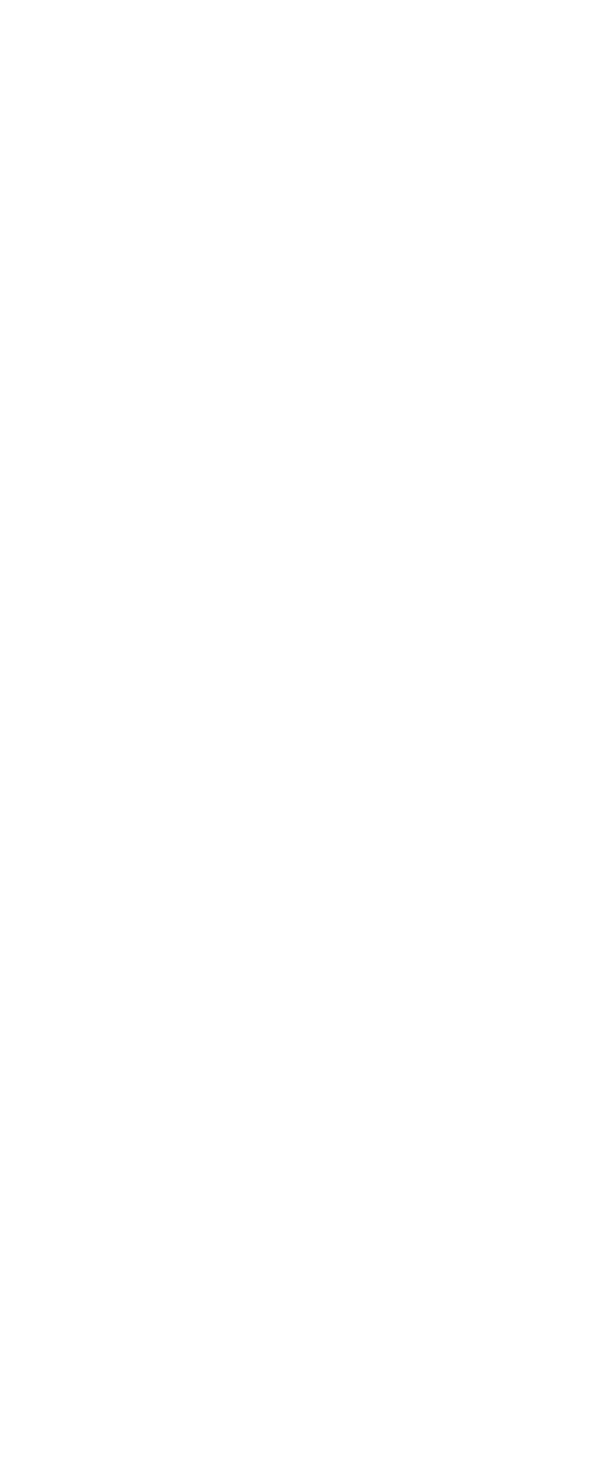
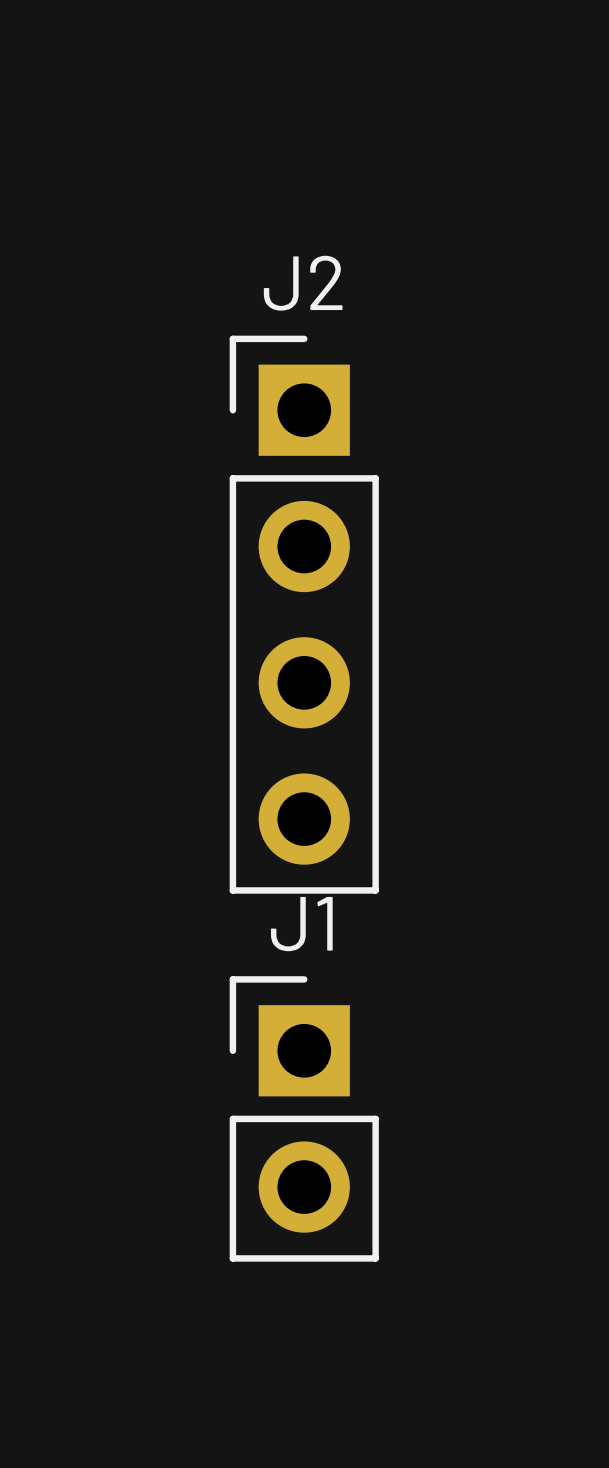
J2: none -> (304, 614)
J1: none -> (304, 1118)

